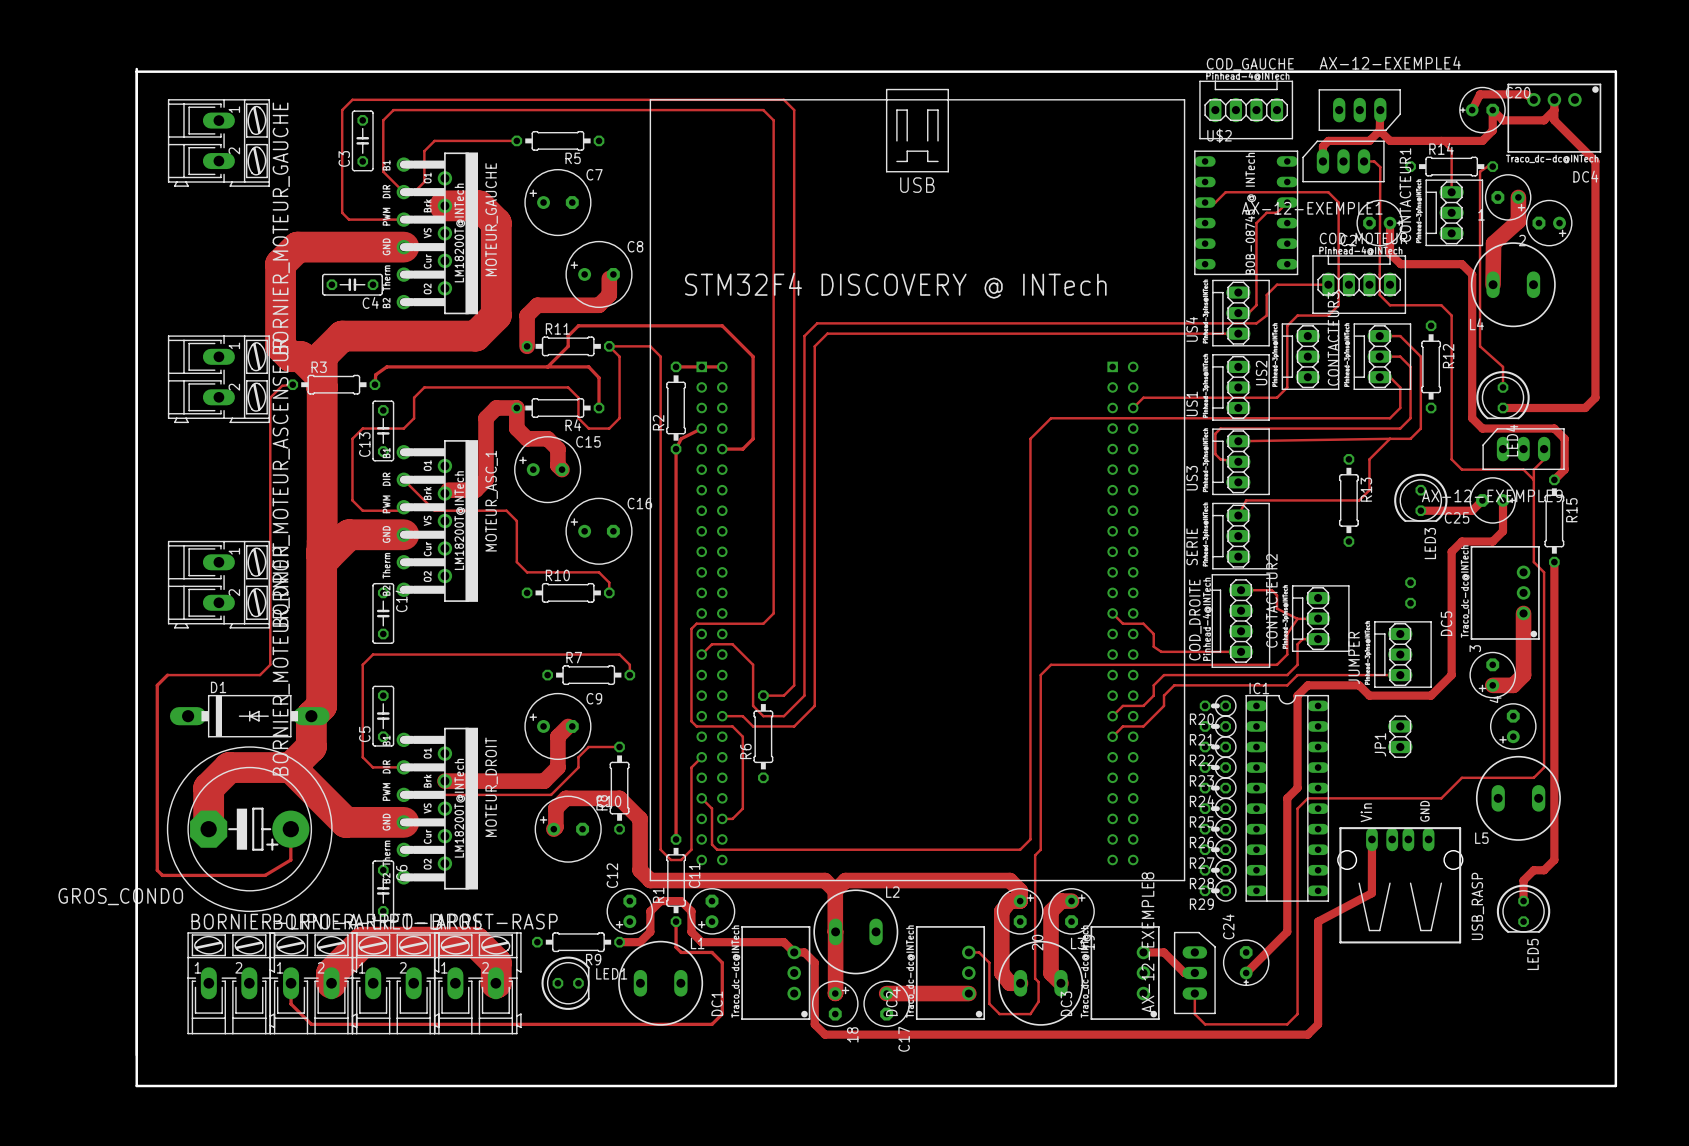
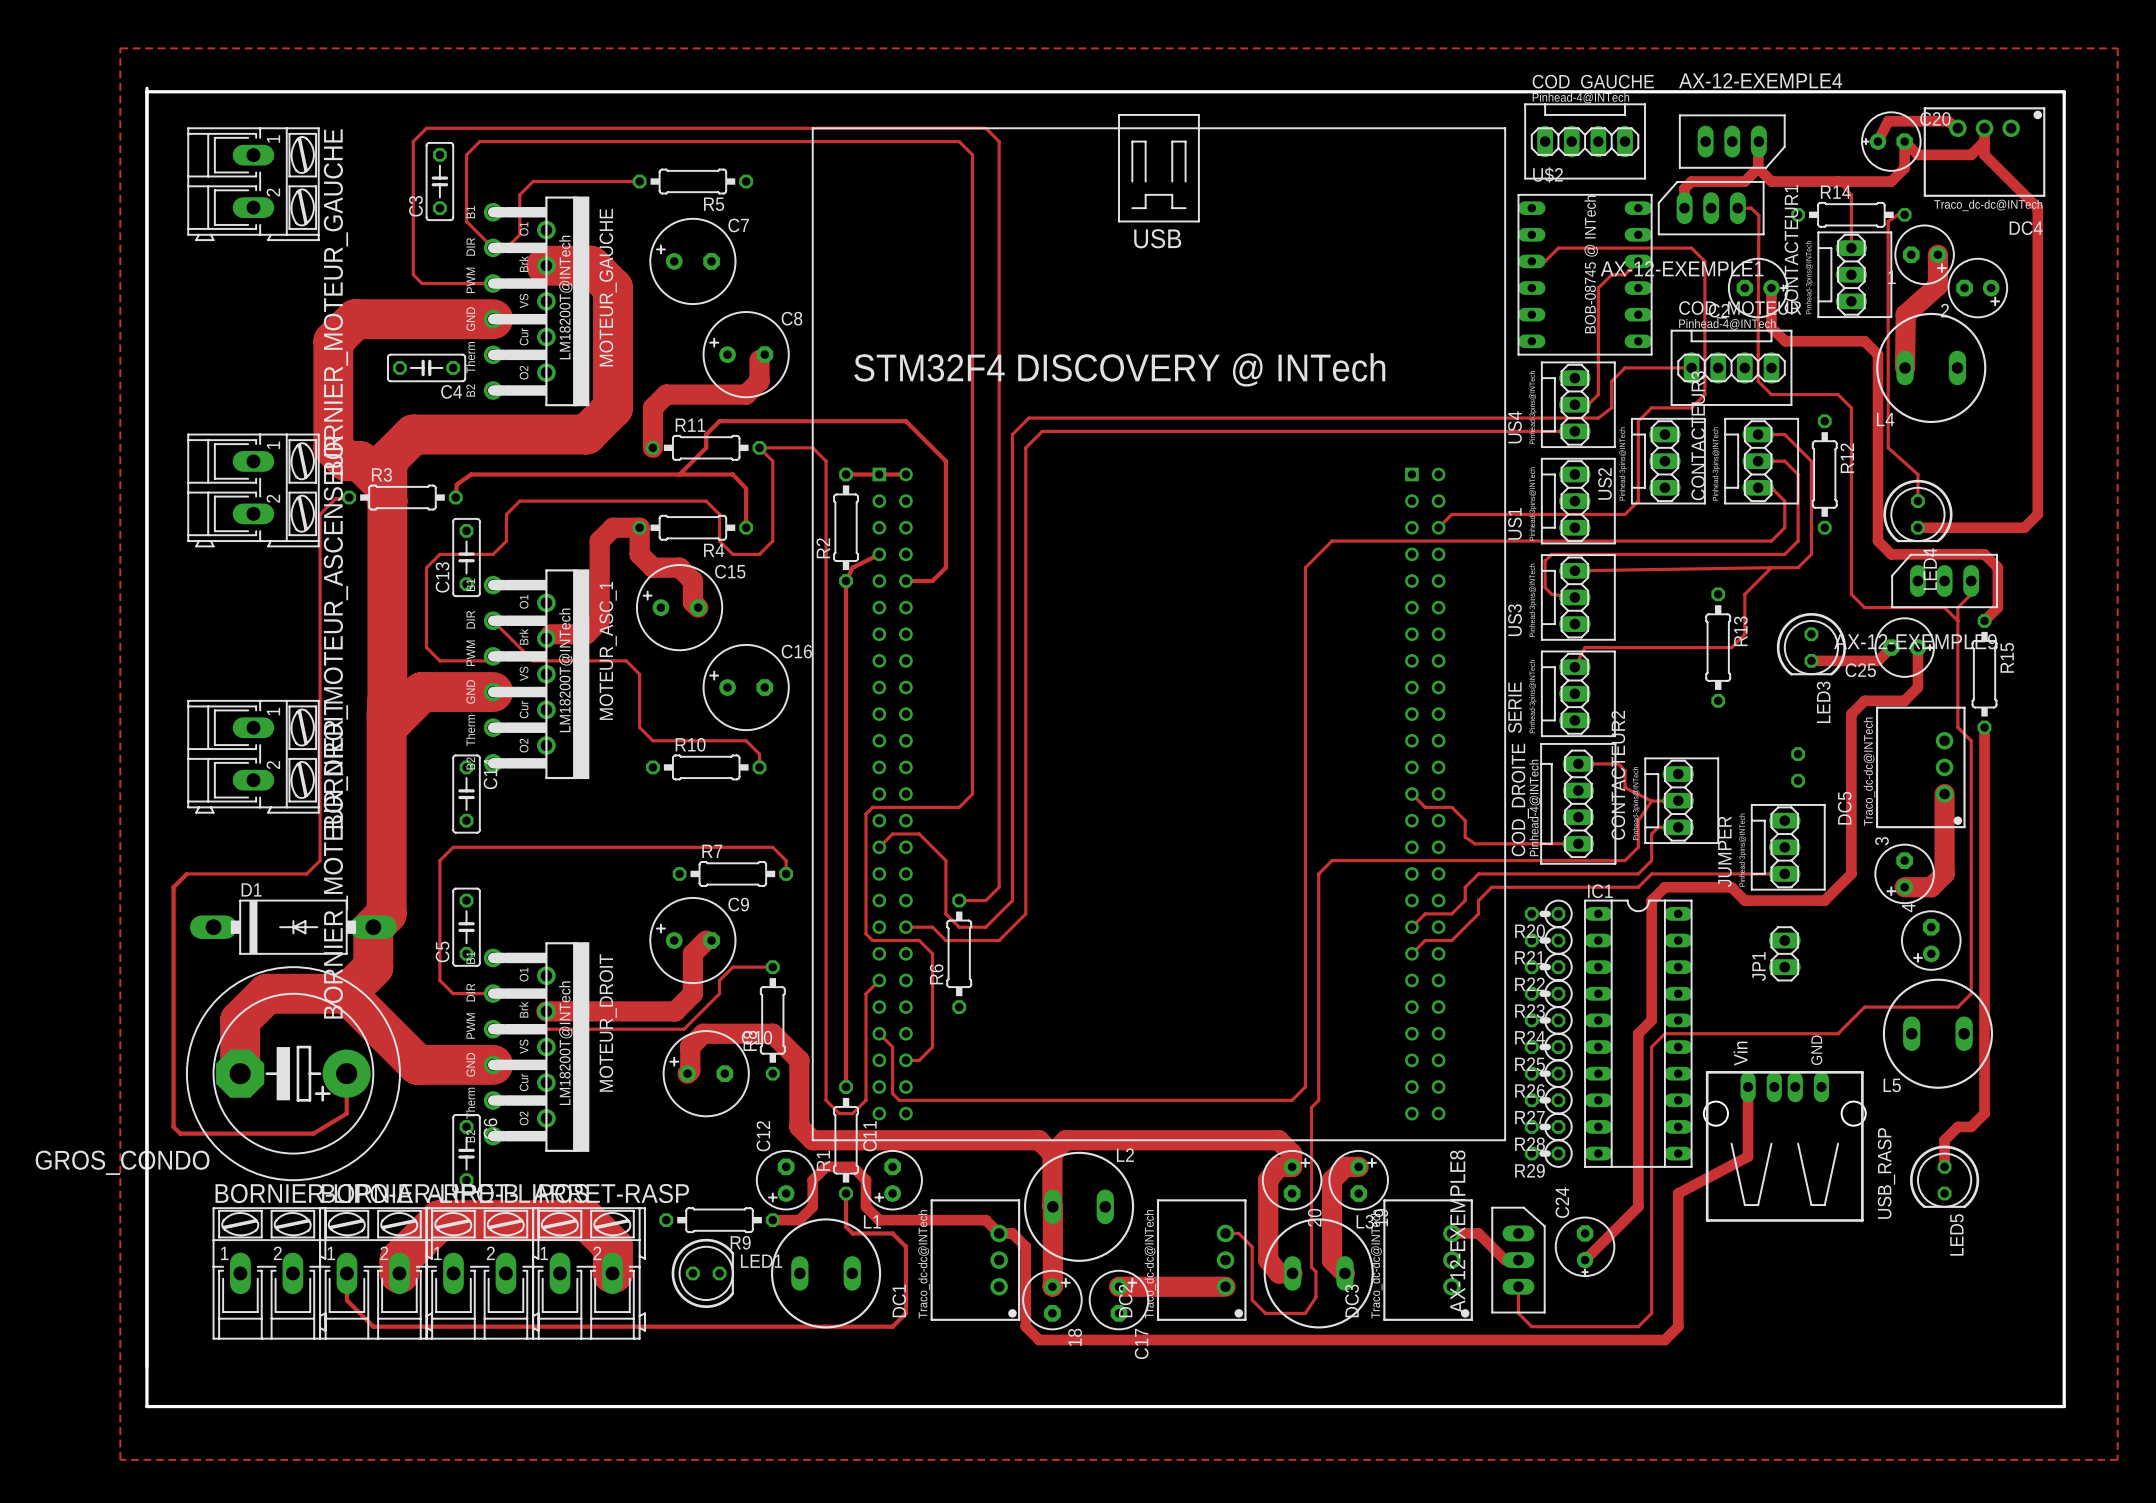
zone outline: none -> (120, 48) (2117, 48) (2117, 1459) (120, 1459) (120, 48)

